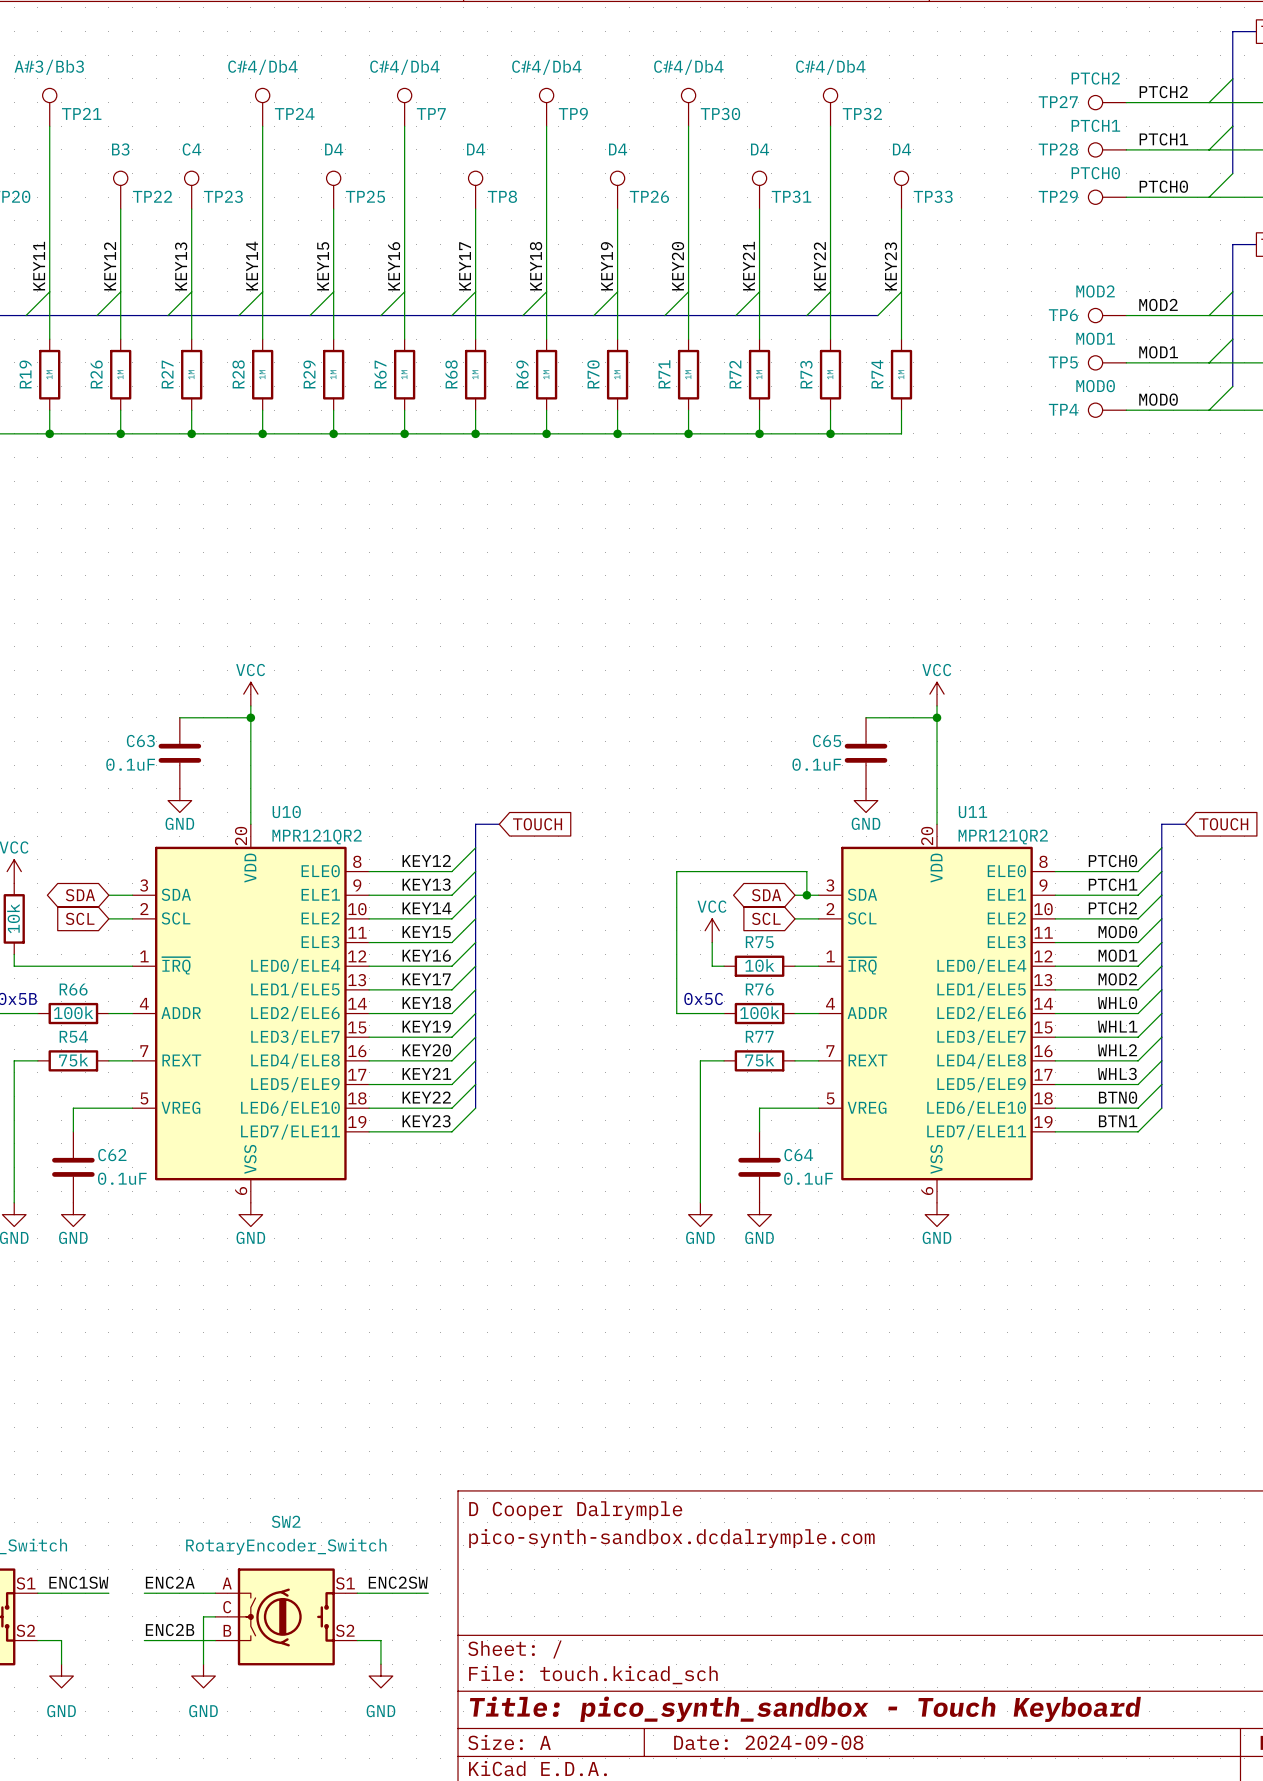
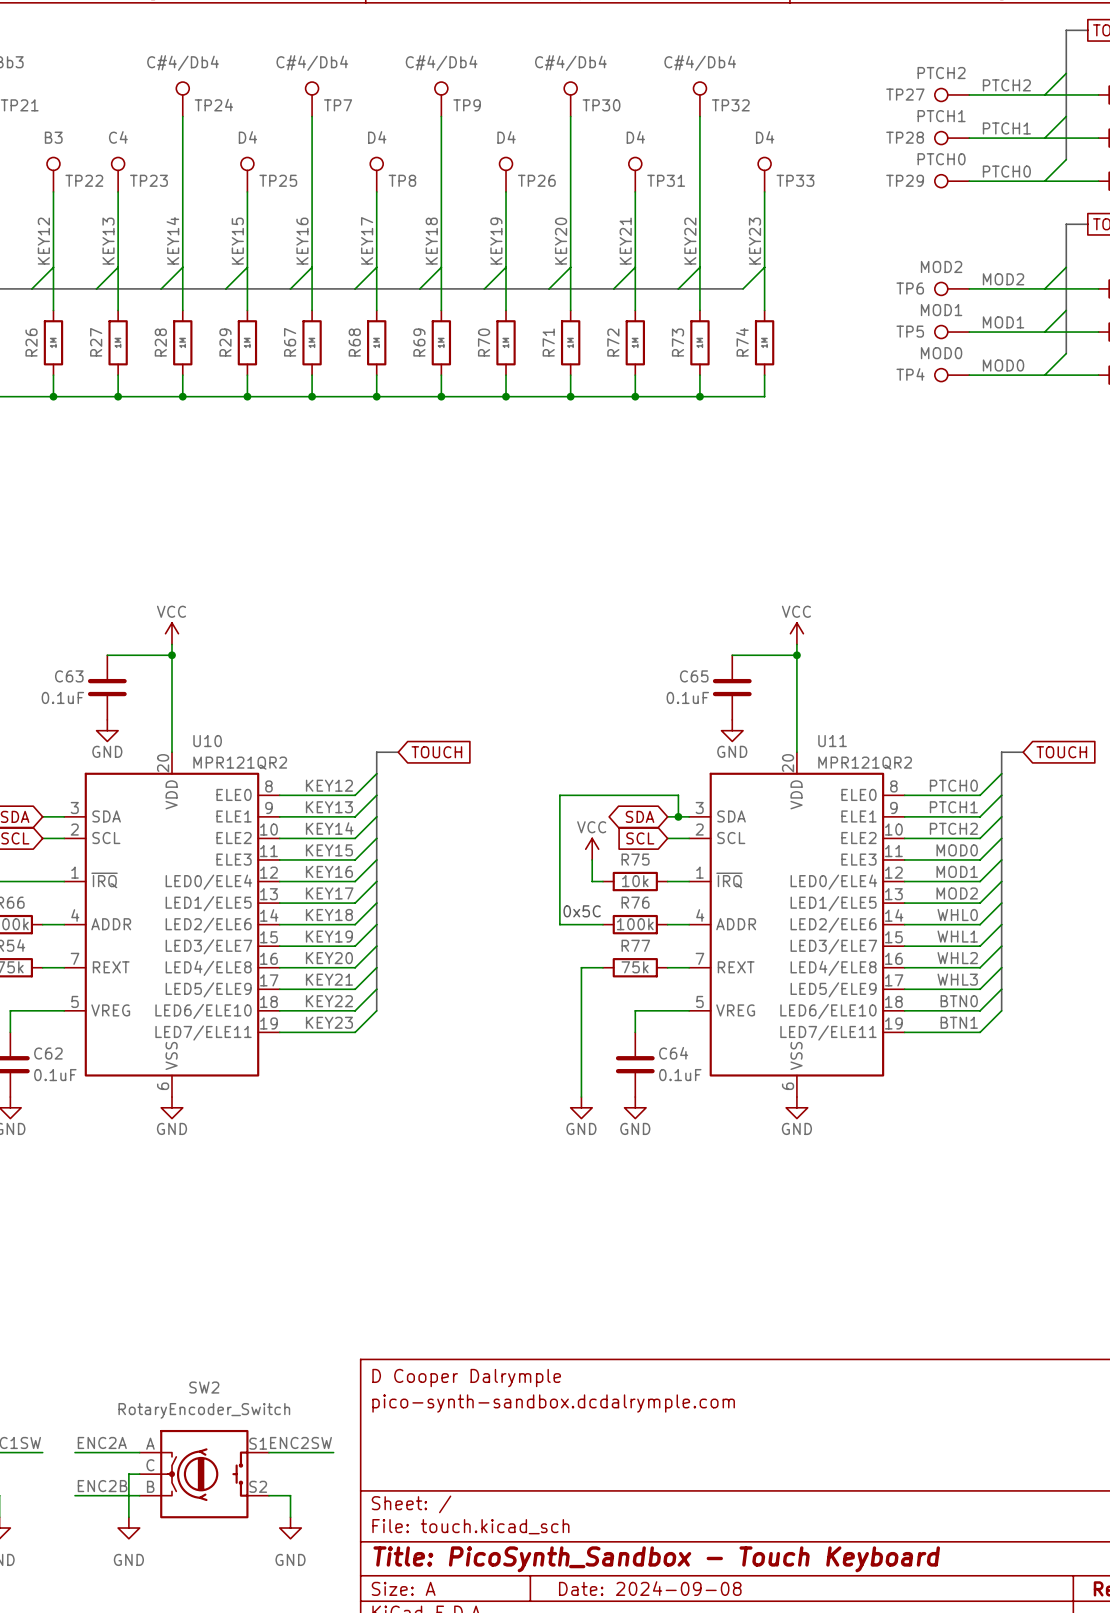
title block: Title: pico_synth_sandbox - Touch Keyboard (805, 1709) -> Title: PicoSynth_Sandbox - Touch Keyboard (656, 1559)

